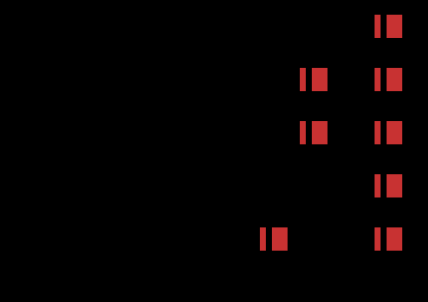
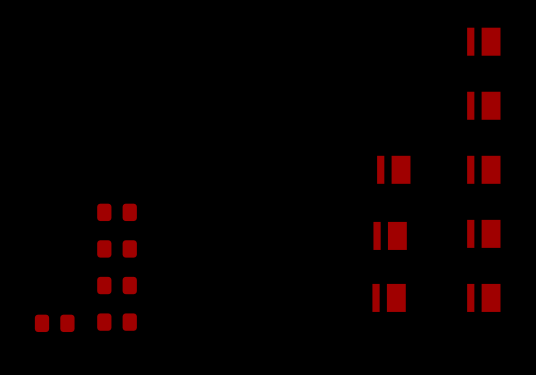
part: (313, 79) -> none
part: none -> (117, 212)
part: none -> (390, 235)
part: none -> (117, 248)
part: none -> (117, 285)
part: (273, 239) -> none
part: none -> (389, 297)
part: none -> (117, 322)
part: none -> (54, 323)

